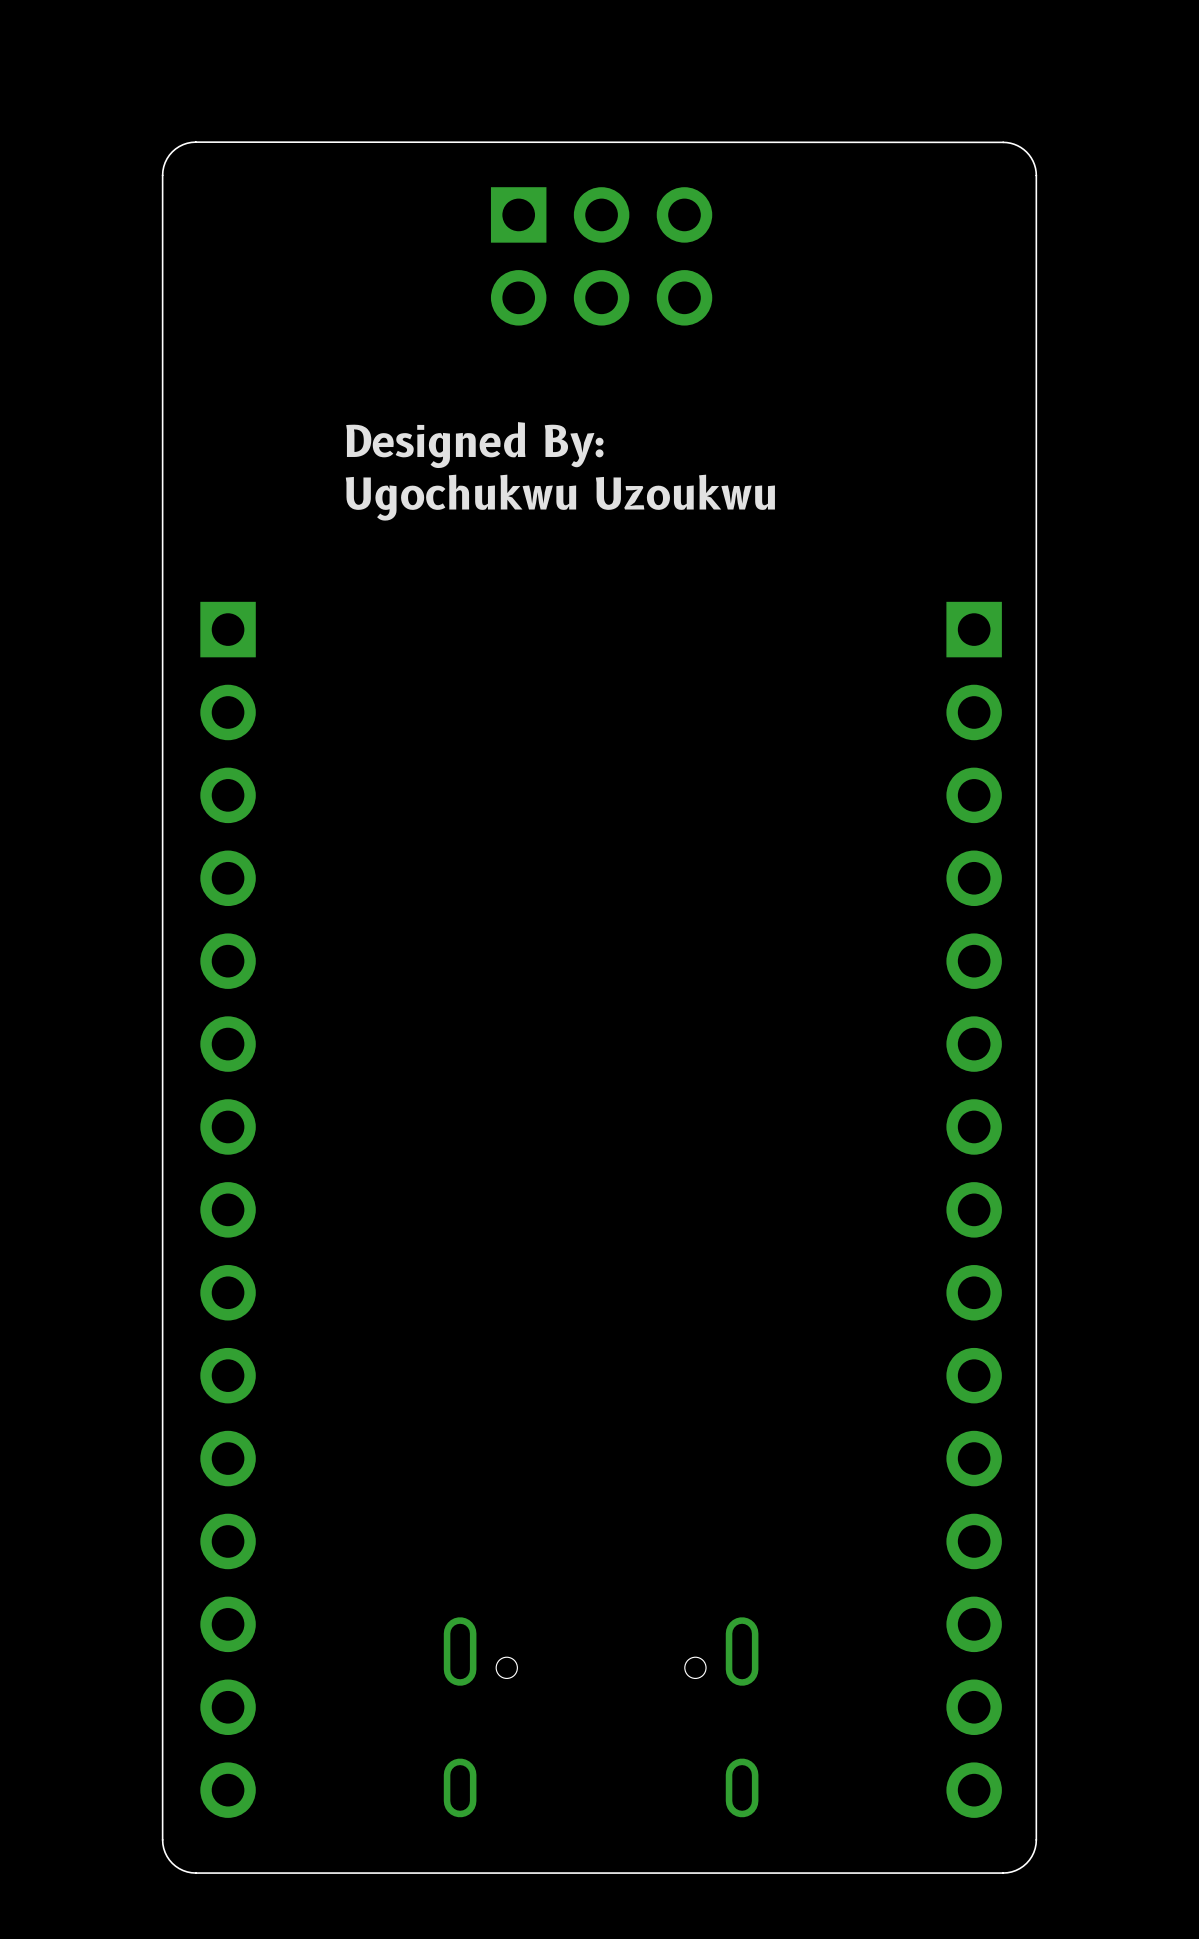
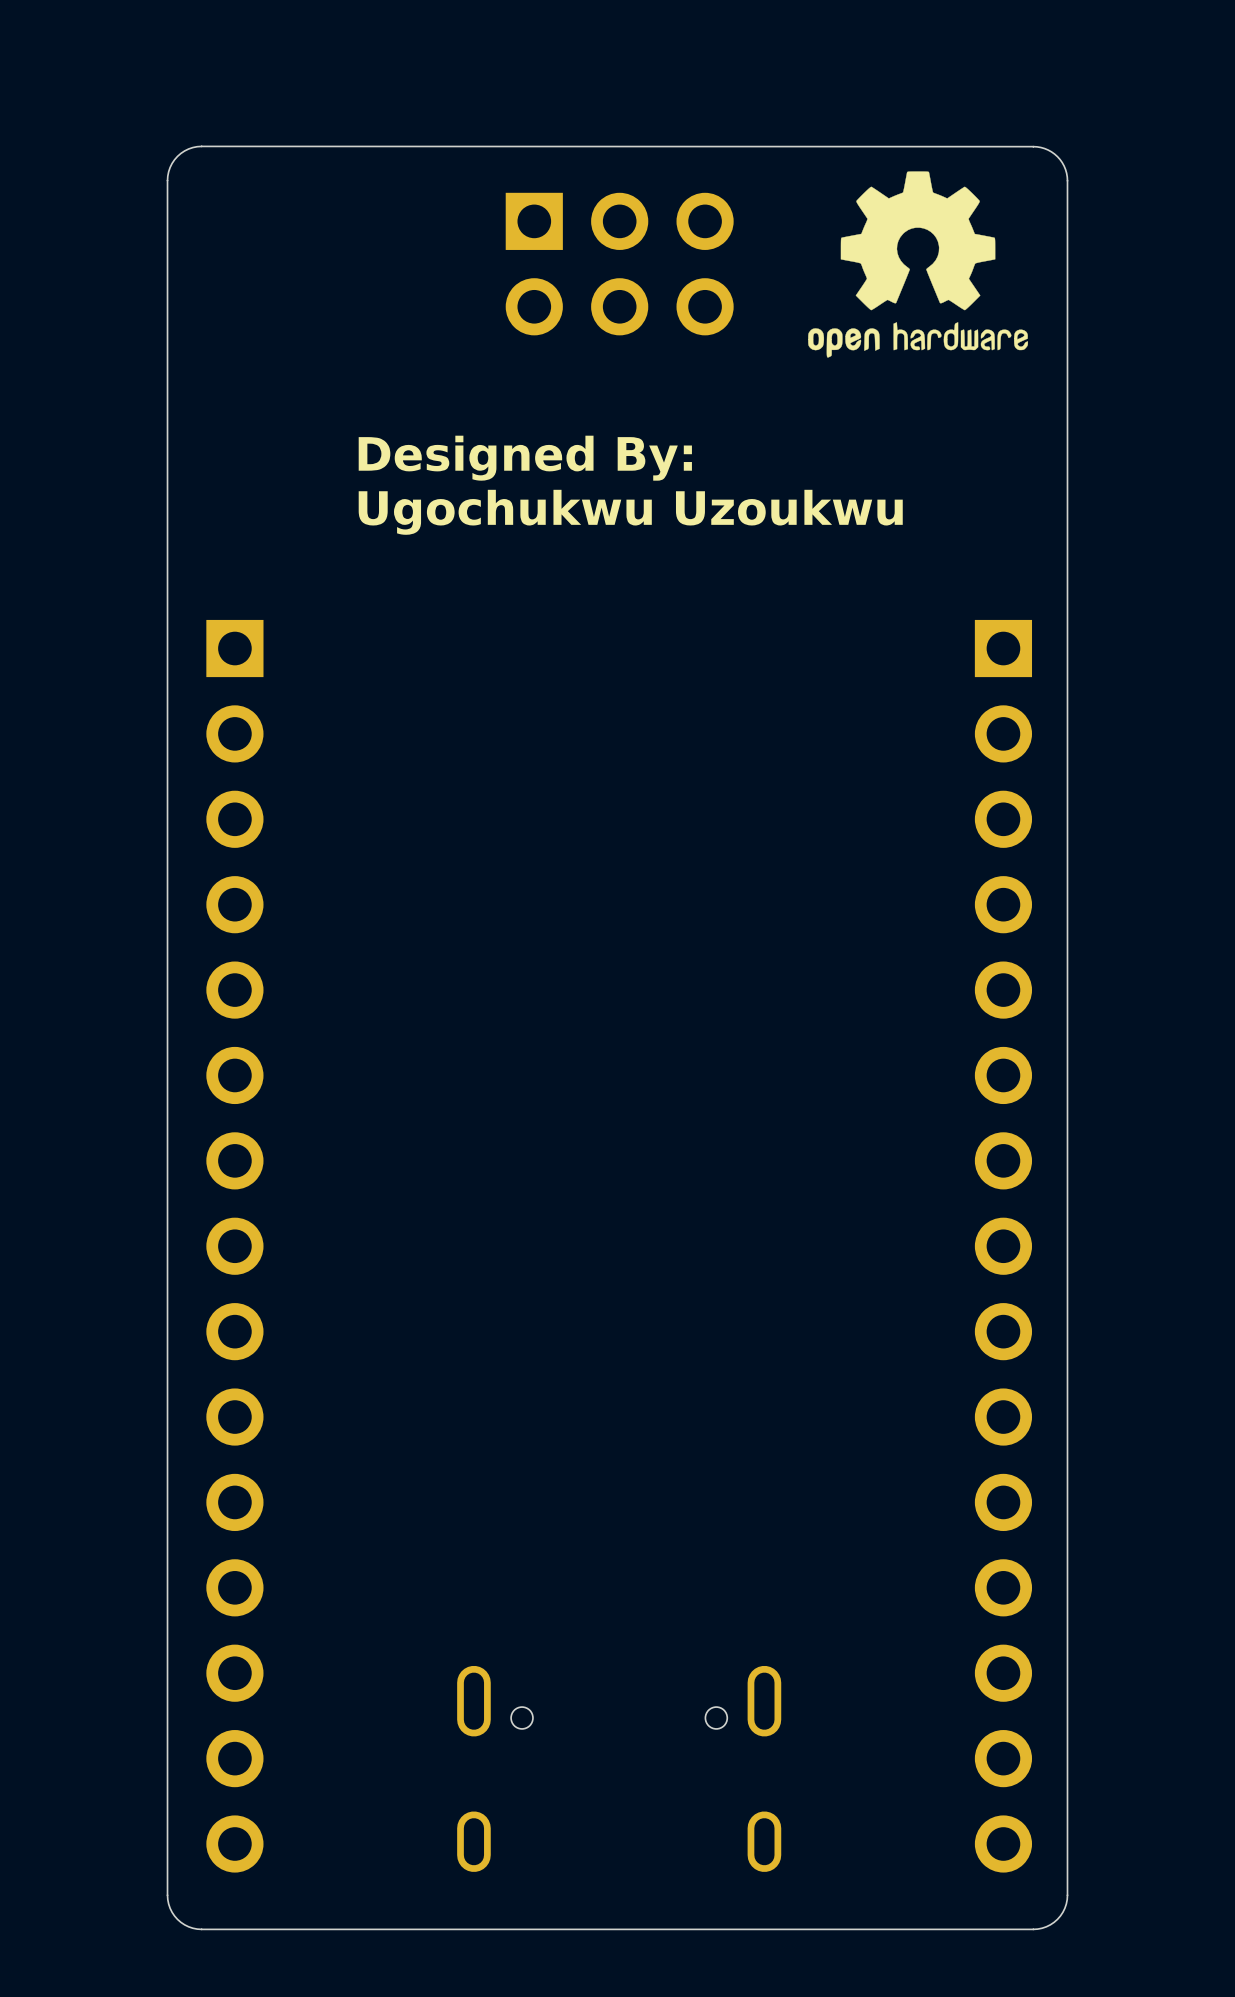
drawing: none -> [808, 171, 1029, 358]

